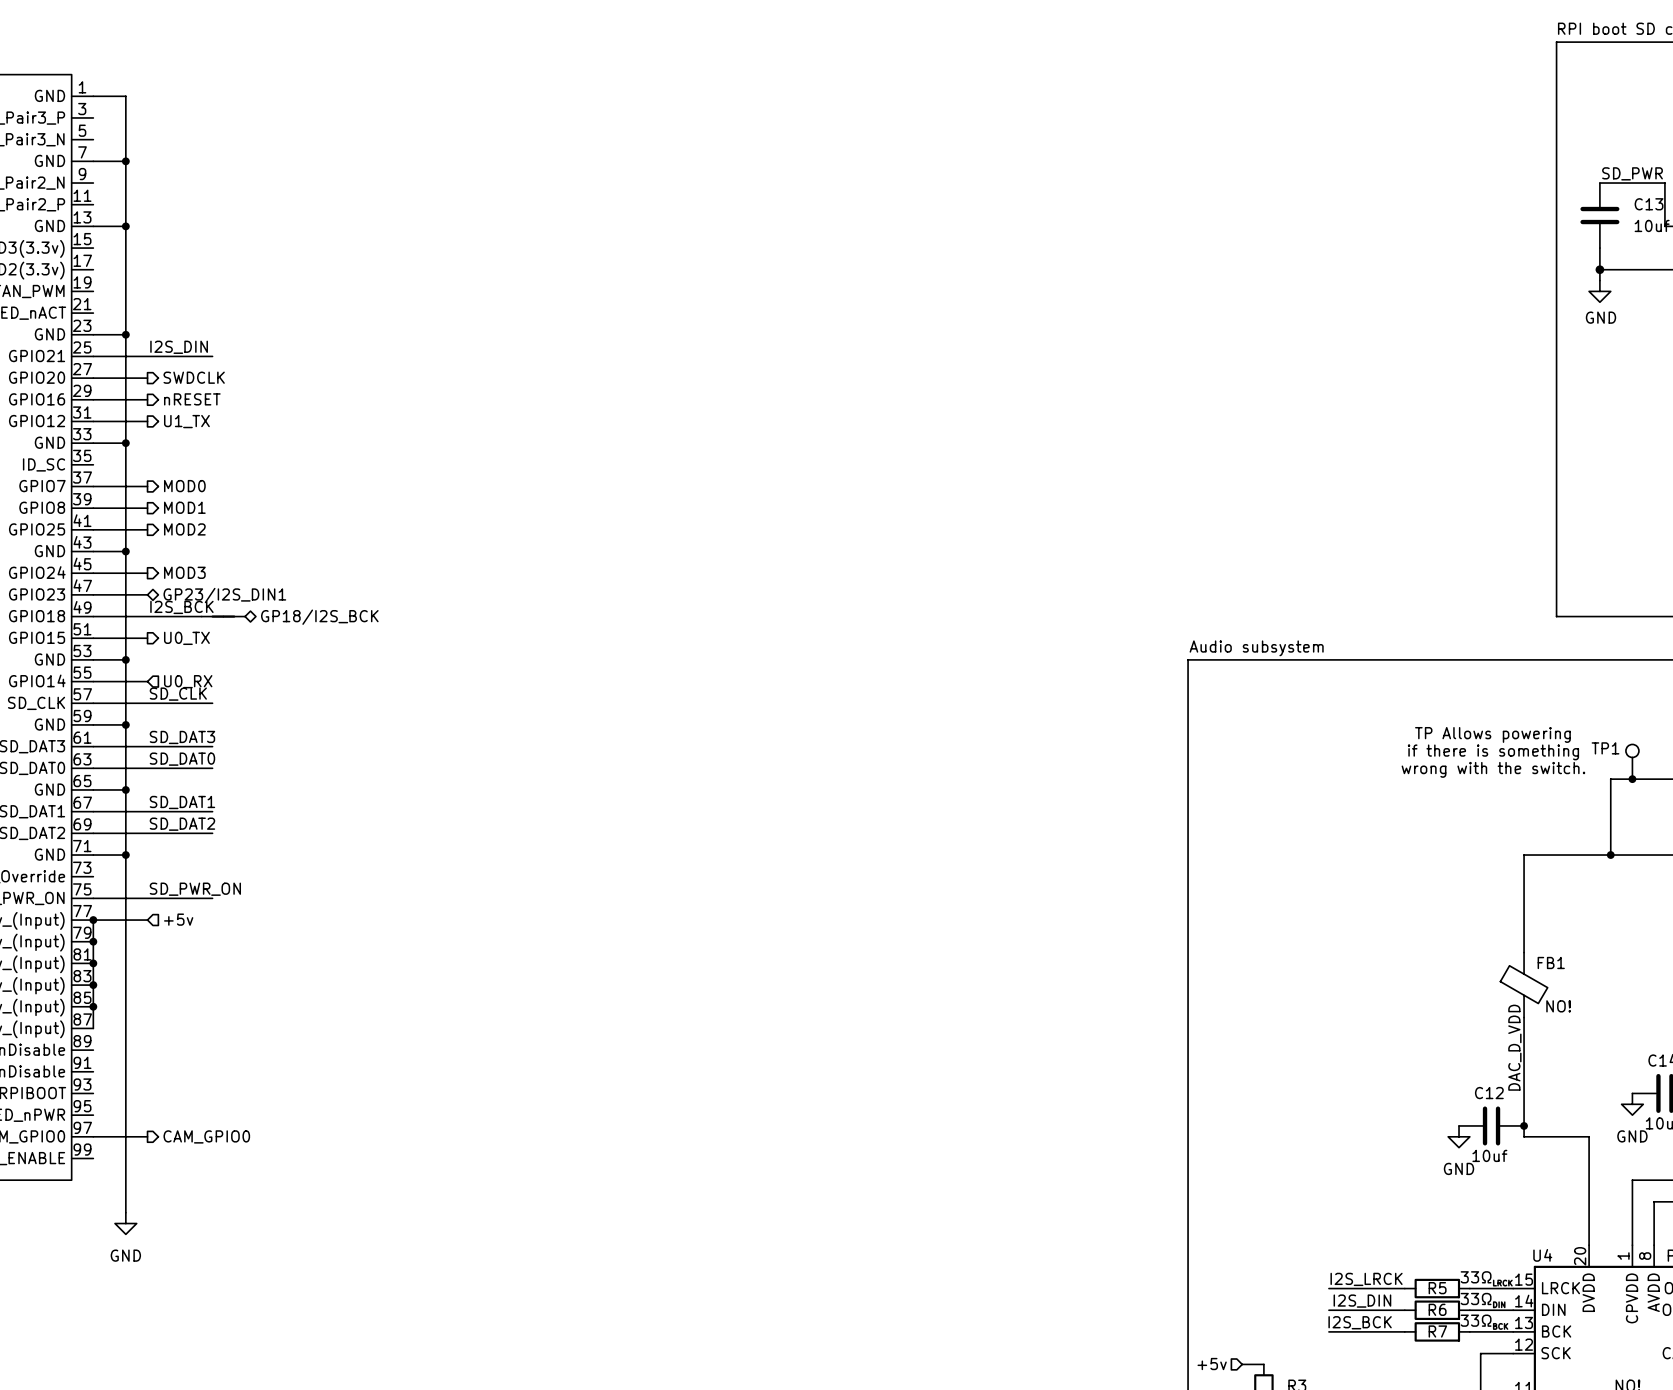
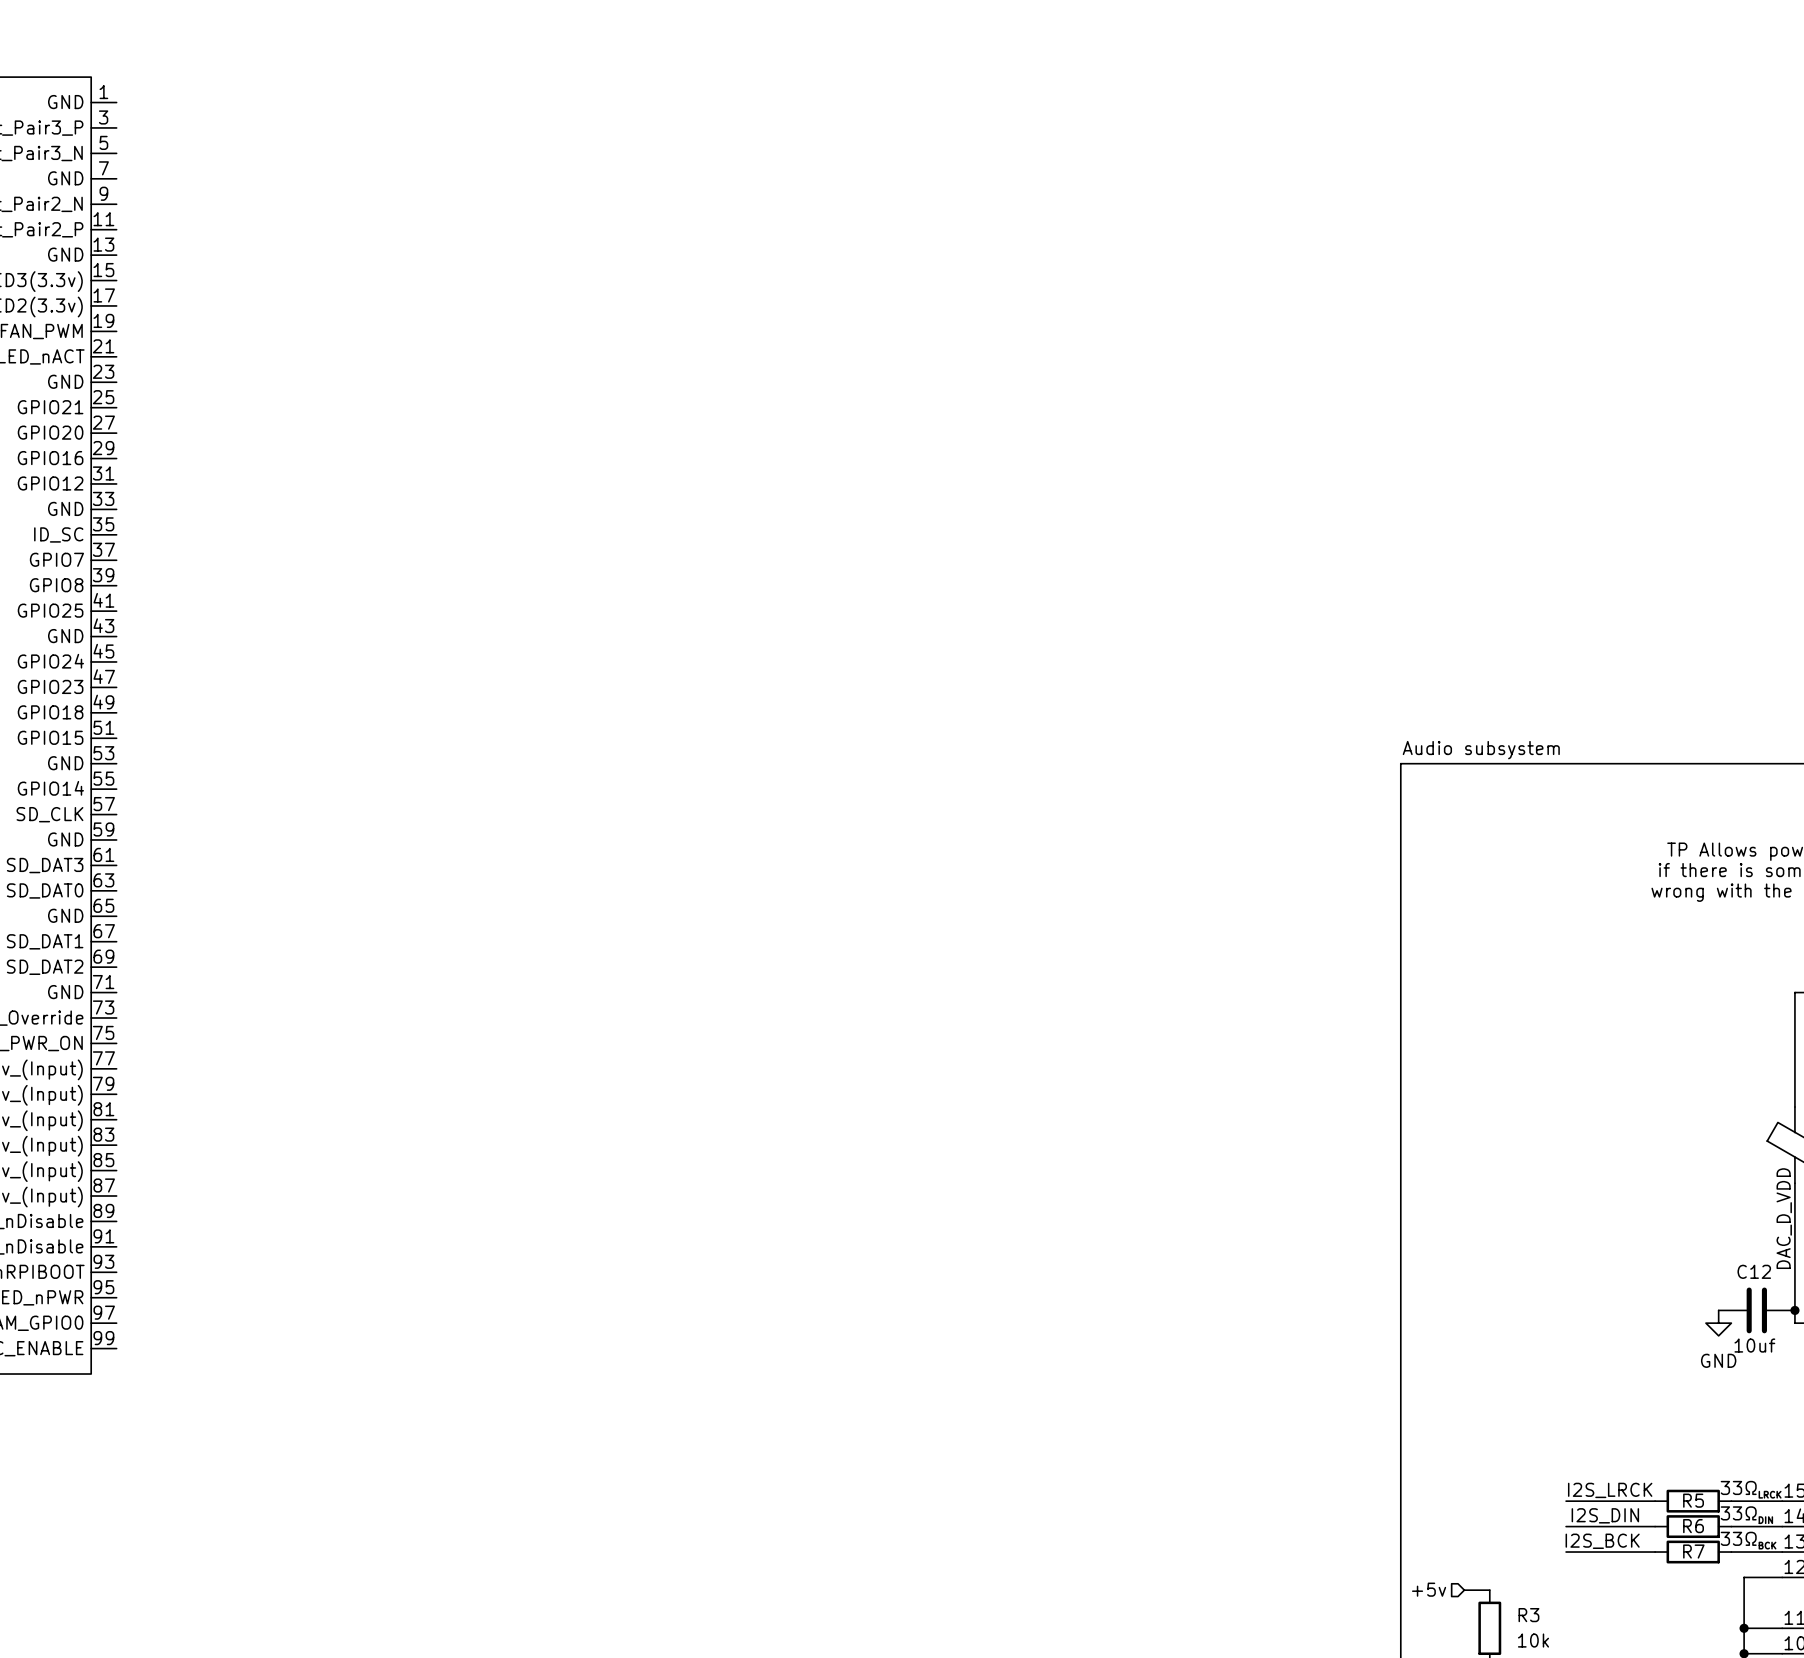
wire: (93, 96) (125, 96) (125, 1212) -> none
wire: (93, 161) (125, 161) -> none
junction: (125, 161) -> none
wire: (93, 226) (125, 226) -> none
junction: (125, 226) -> none
wire: (93, 334) (125, 334) -> none
junction: (125, 334) -> none
label: I2S_DIN (179, 347) -> none
wire: (93, 356) (212, 356) -> none
hierarchical label: SWDCLK (194, 377) -> none
wire: (93, 378) (147, 378) -> none
wire: (93, 399) (147, 399) -> none
hierarchical label: nRESET (192, 399) -> none
wire: (93, 421) (147, 421) -> none
hierarchical label: U1_TX (186, 421) -> none
wire: (93, 443) (125, 443) -> none
junction: (125, 443) -> none
wire: (93, 486) (147, 486) -> none
hierarchical label: MOD0 (184, 486) -> none
hierarchical label: MOD1 (184, 507) -> none
wire: (93, 508) (147, 508) -> none
wire: (93, 529) (147, 529) -> none
hierarchical label: MOD2 (184, 529) -> none
wire: (93, 551) (125, 551) -> none
junction: (125, 551) -> none
hierarchical label: MOD3 (184, 572) -> none
wire: (93, 573) (147, 573) -> none
wire: (93, 594) (147, 594) -> none
hierarchical label: GP23/I2S_DIN1 (224, 595) -> none
label: I2S_BCK (181, 607) -> none
wire: (93, 616) (201, 616) -> none
part: (223, 616) -> none
hierarchical label: GP18/I2S_BCK (319, 617) -> none
wire: (93, 638) (147, 638) -> none
hierarchical label: U0_TX (186, 638) -> none
wire: (93, 659) (125, 659) -> none
junction: (125, 659) -> none
wire: (93, 681) (147, 681) -> none
hierarchical label: U0_RX (188, 681) -> none
label: SD_CLK (178, 694) -> none
wire: (93, 703) (212, 703) -> none
wire: (93, 724) (125, 724) -> none
junction: (125, 724) -> none
label: SD_DAT3 (182, 737) -> none
wire: (93, 746) (212, 746) -> none
label: SD_DAT0 (182, 759) -> none
wire: (93, 768) (212, 768) -> none
wire: (93, 789) (125, 789) -> none
junction: (125, 789) -> none
label: SD_DAT1 (182, 802) -> none
wire: (93, 811) (212, 811) -> none
label: SD_DAT2 (182, 824) -> none
wire: (93, 833) (212, 833) -> none
wire: (93, 855) (125, 855) -> none
junction: (125, 855) -> none
label: SD_PWR_ON (195, 889) -> none
wire: (93, 898) (212, 898) -> none
hierarchical label: +5v (178, 919) -> none
junction: (93, 920) -> none
wire: (147, 920) (93, 920) (93, 1028) -> none
junction: (93, 941) -> none
junction: (93, 963) -> none
junction: (93, 985) -> none
junction: (93, 1006) -> none
wire: (93, 1136) (147, 1136) -> none
hierarchical label: CAM_GPIO0 (206, 1136) -> none
power symbol: GND (125, 1223) -> none

